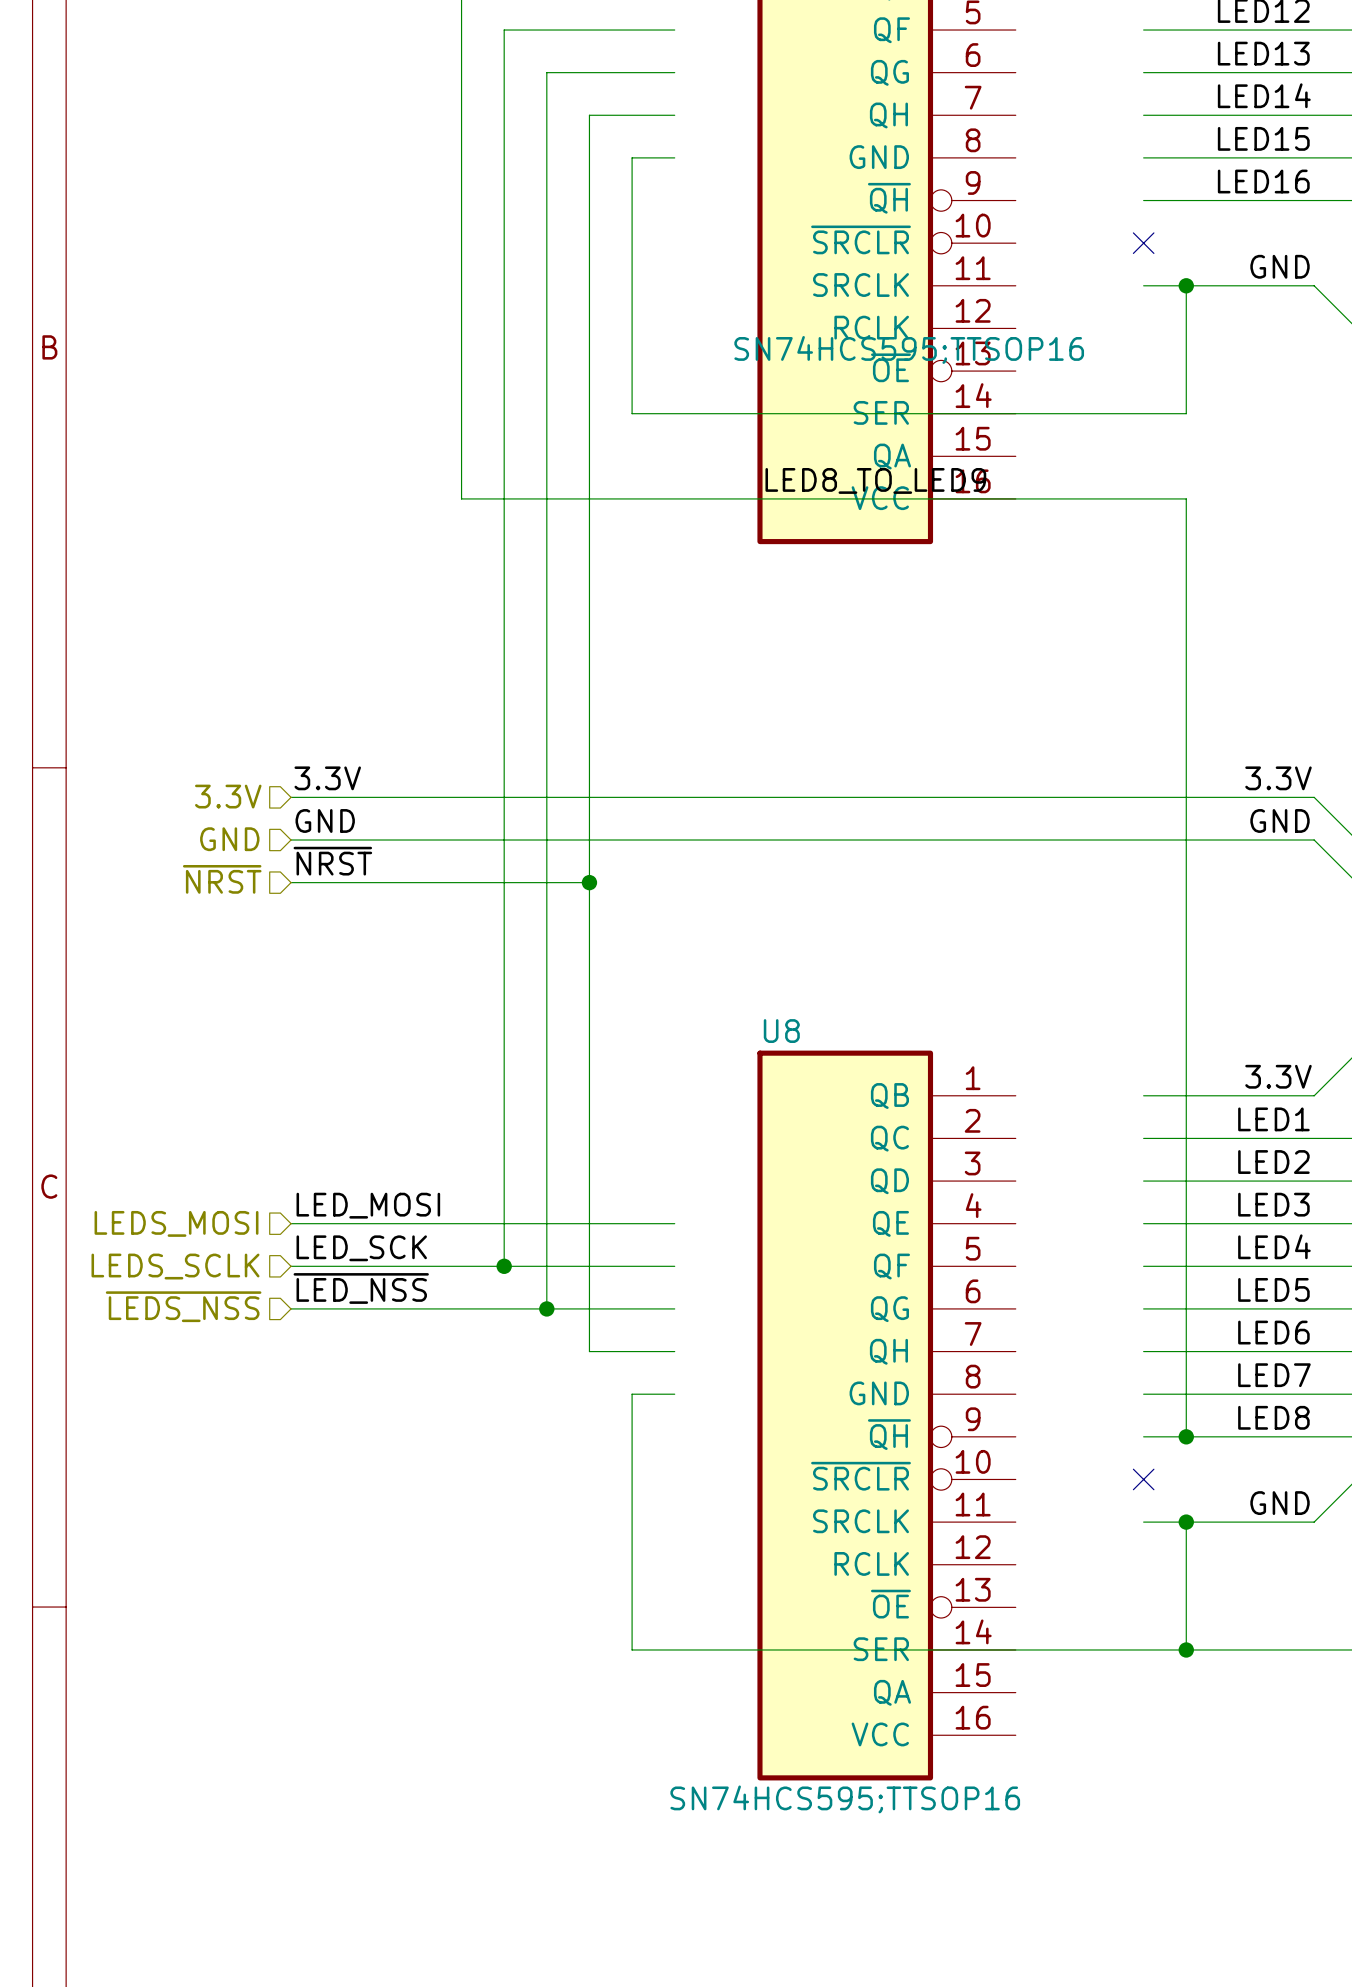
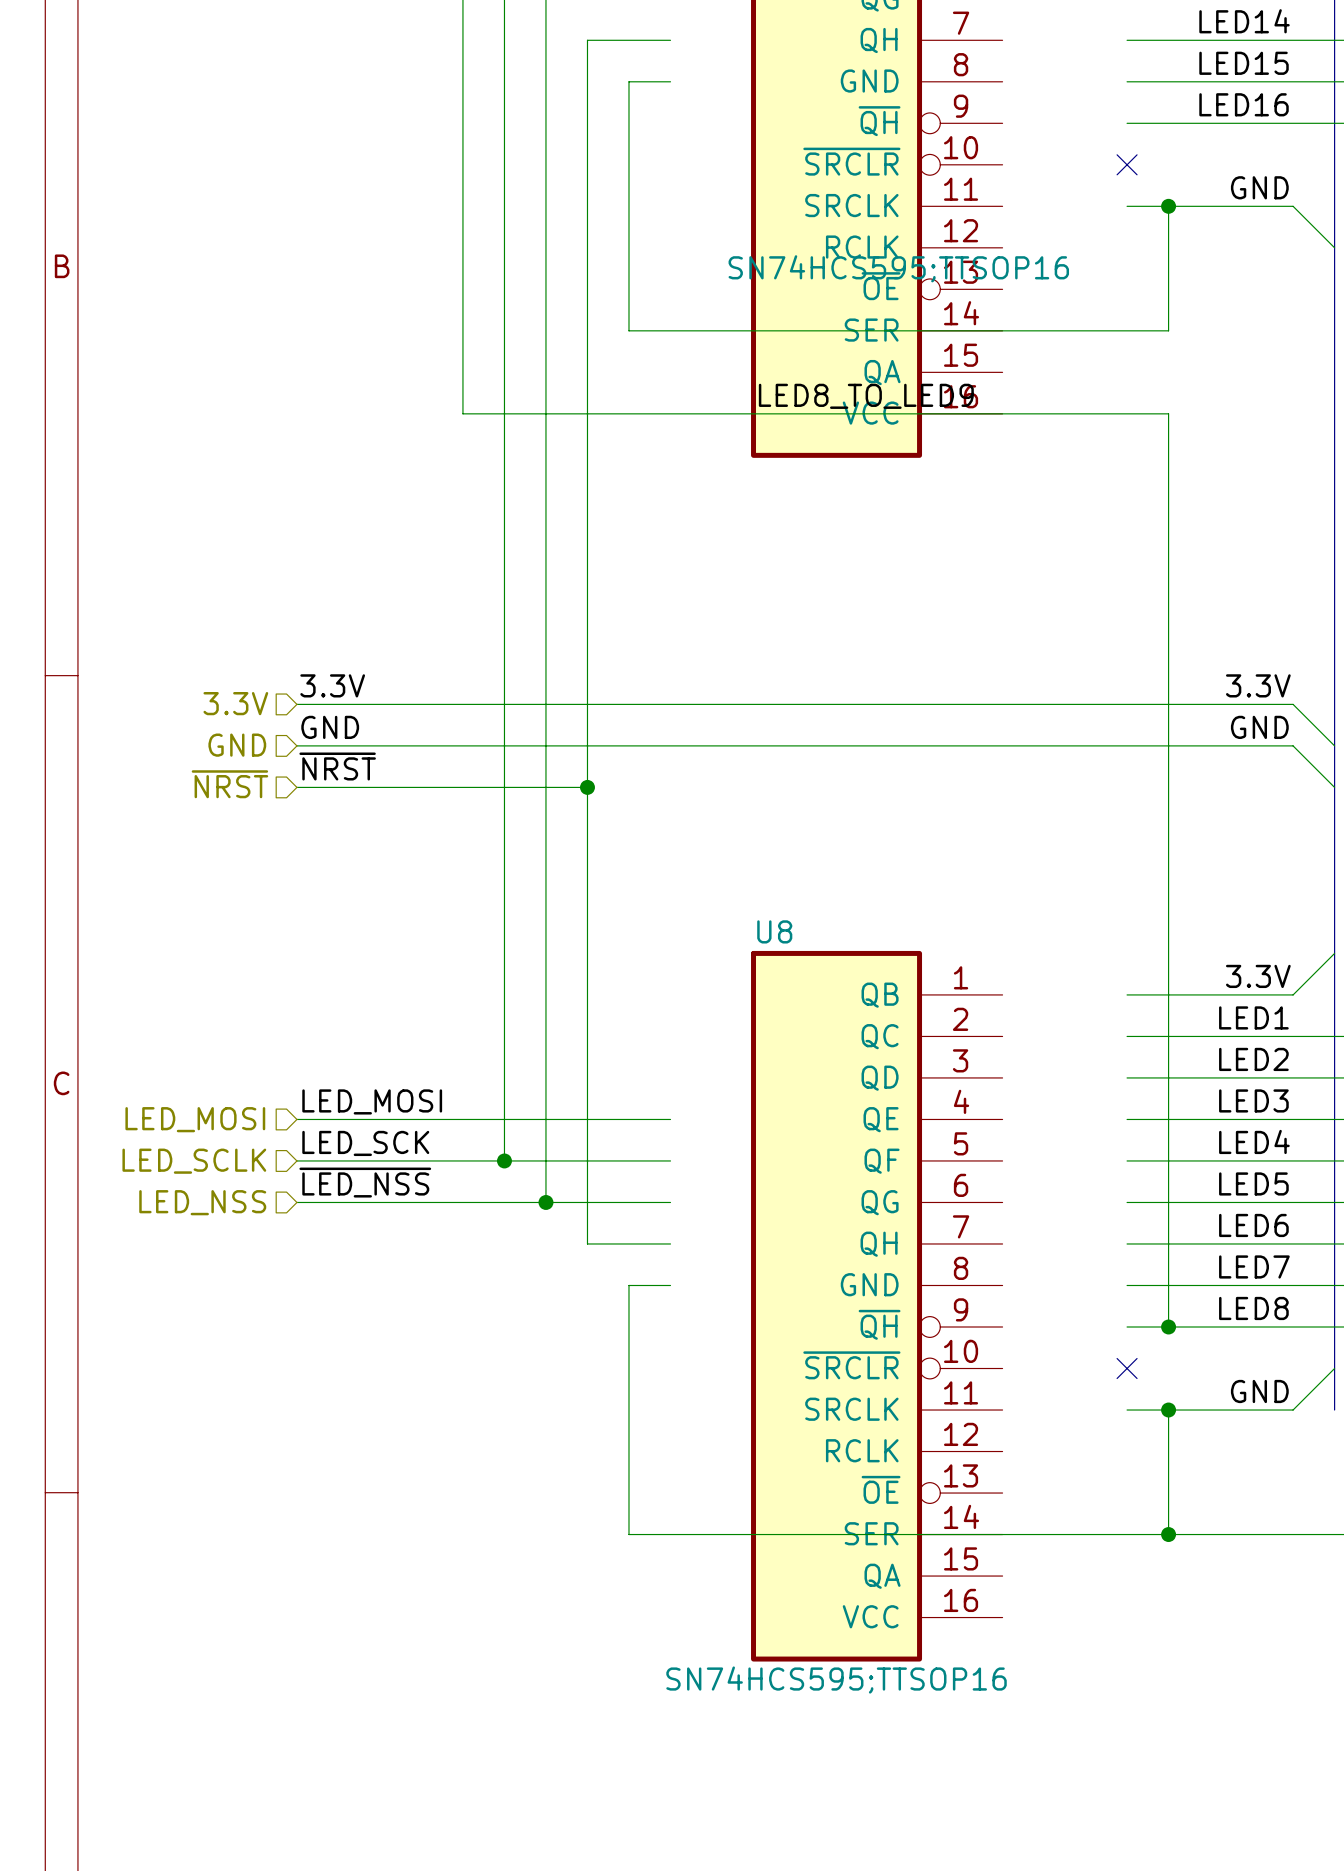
hierarchical label: LEDS_MOSI (176, 1223) -> LED_MOSI (195, 1119)
hierarchical label: LEDS_SCLK (175, 1266) -> LED_SCLK (194, 1161)
hierarchical label: ~{LEDS_NSS} (183, 1306) -> LED_NSS (202, 1202)

